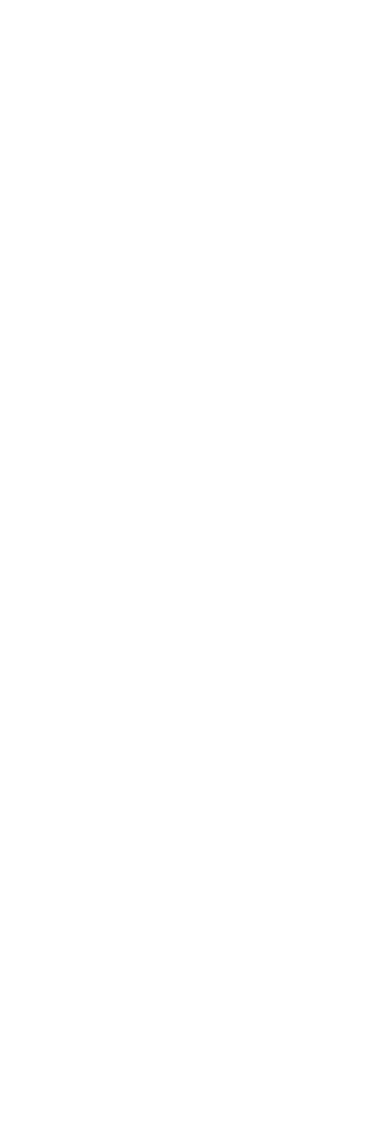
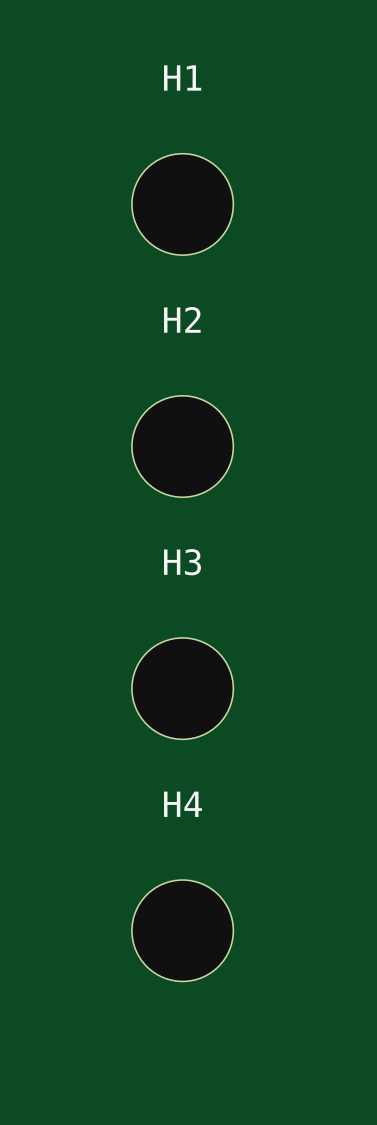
H1: none -> (182, 204)
H2: none -> (182, 446)
H3: none -> (182, 688)
H4: none -> (182, 930)

